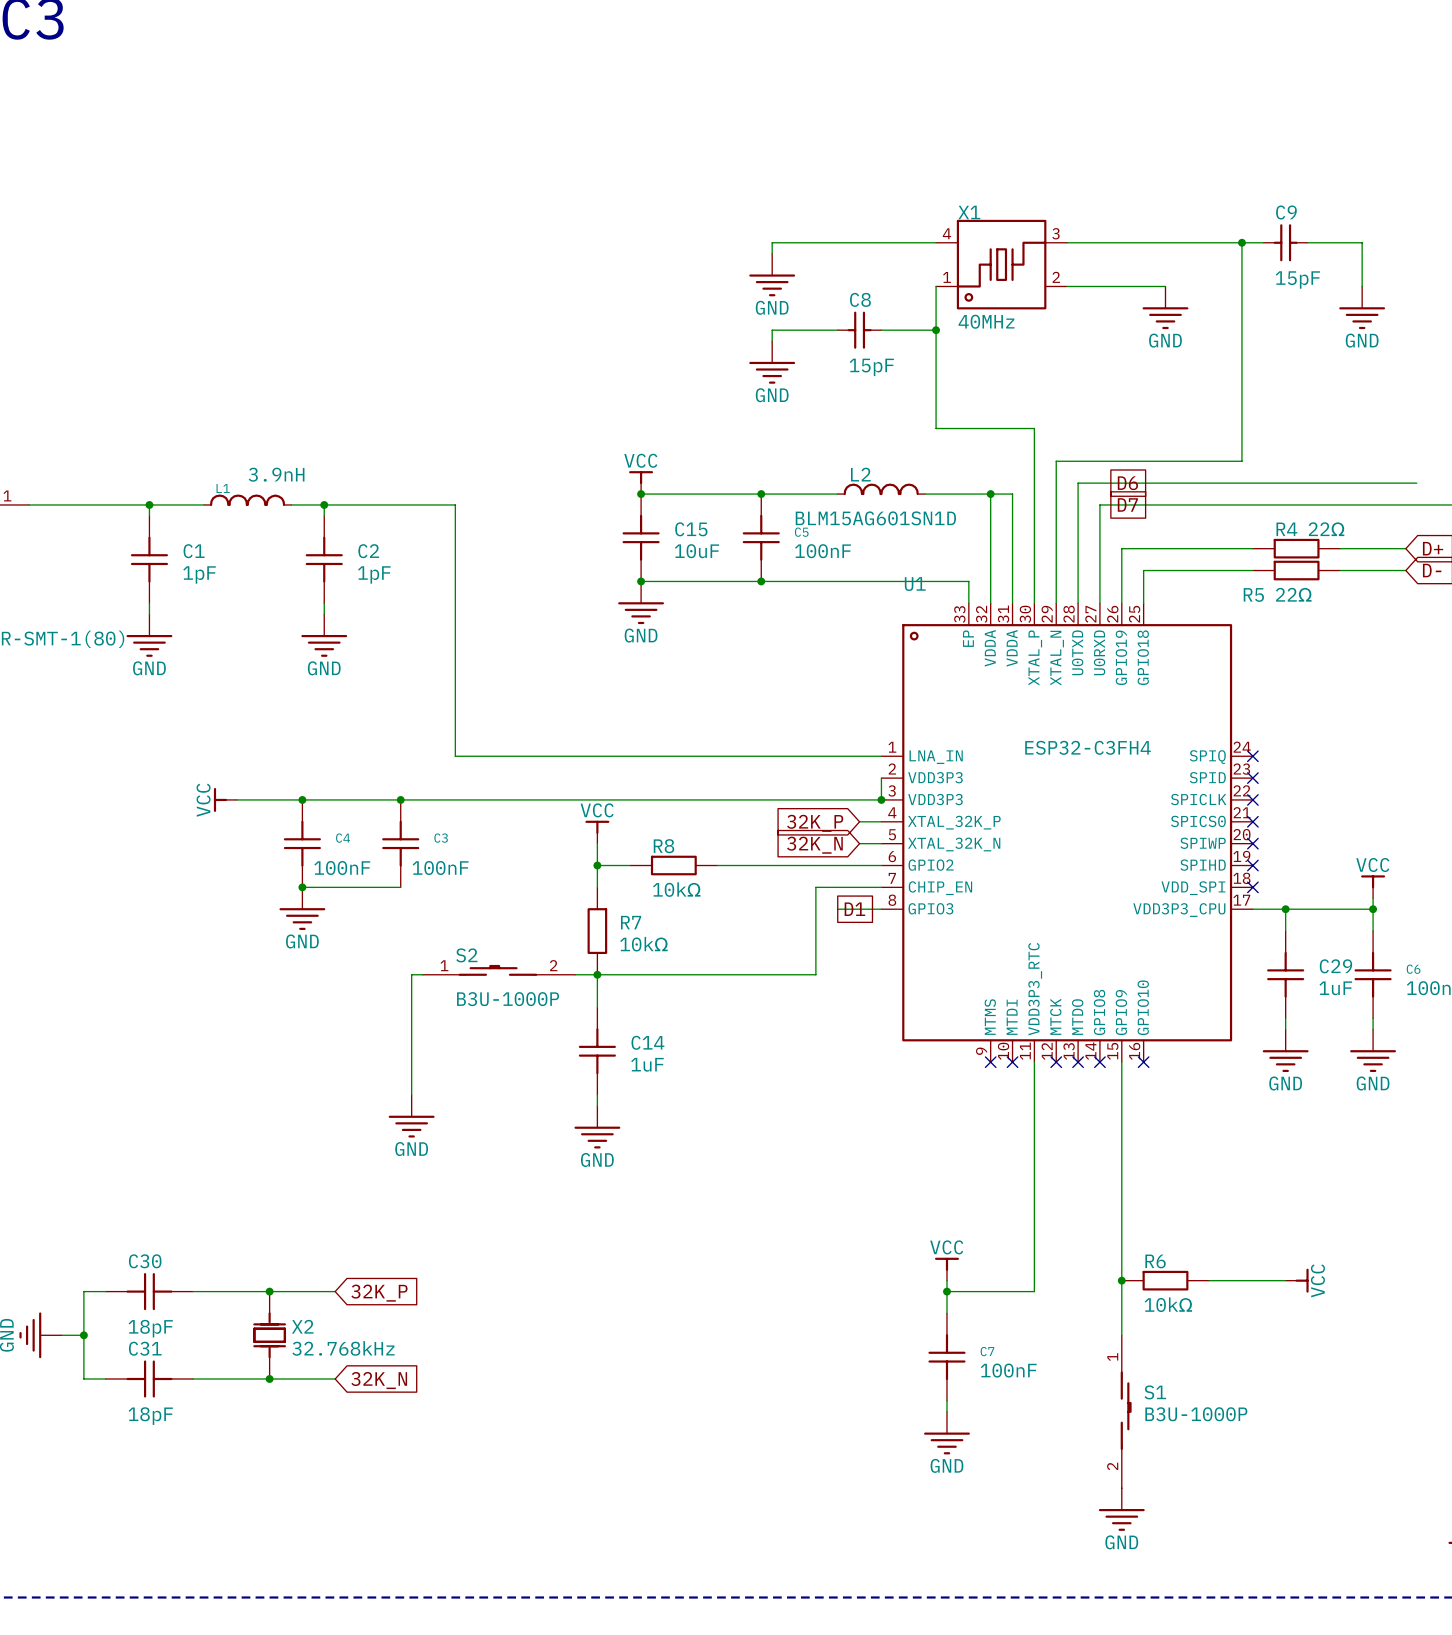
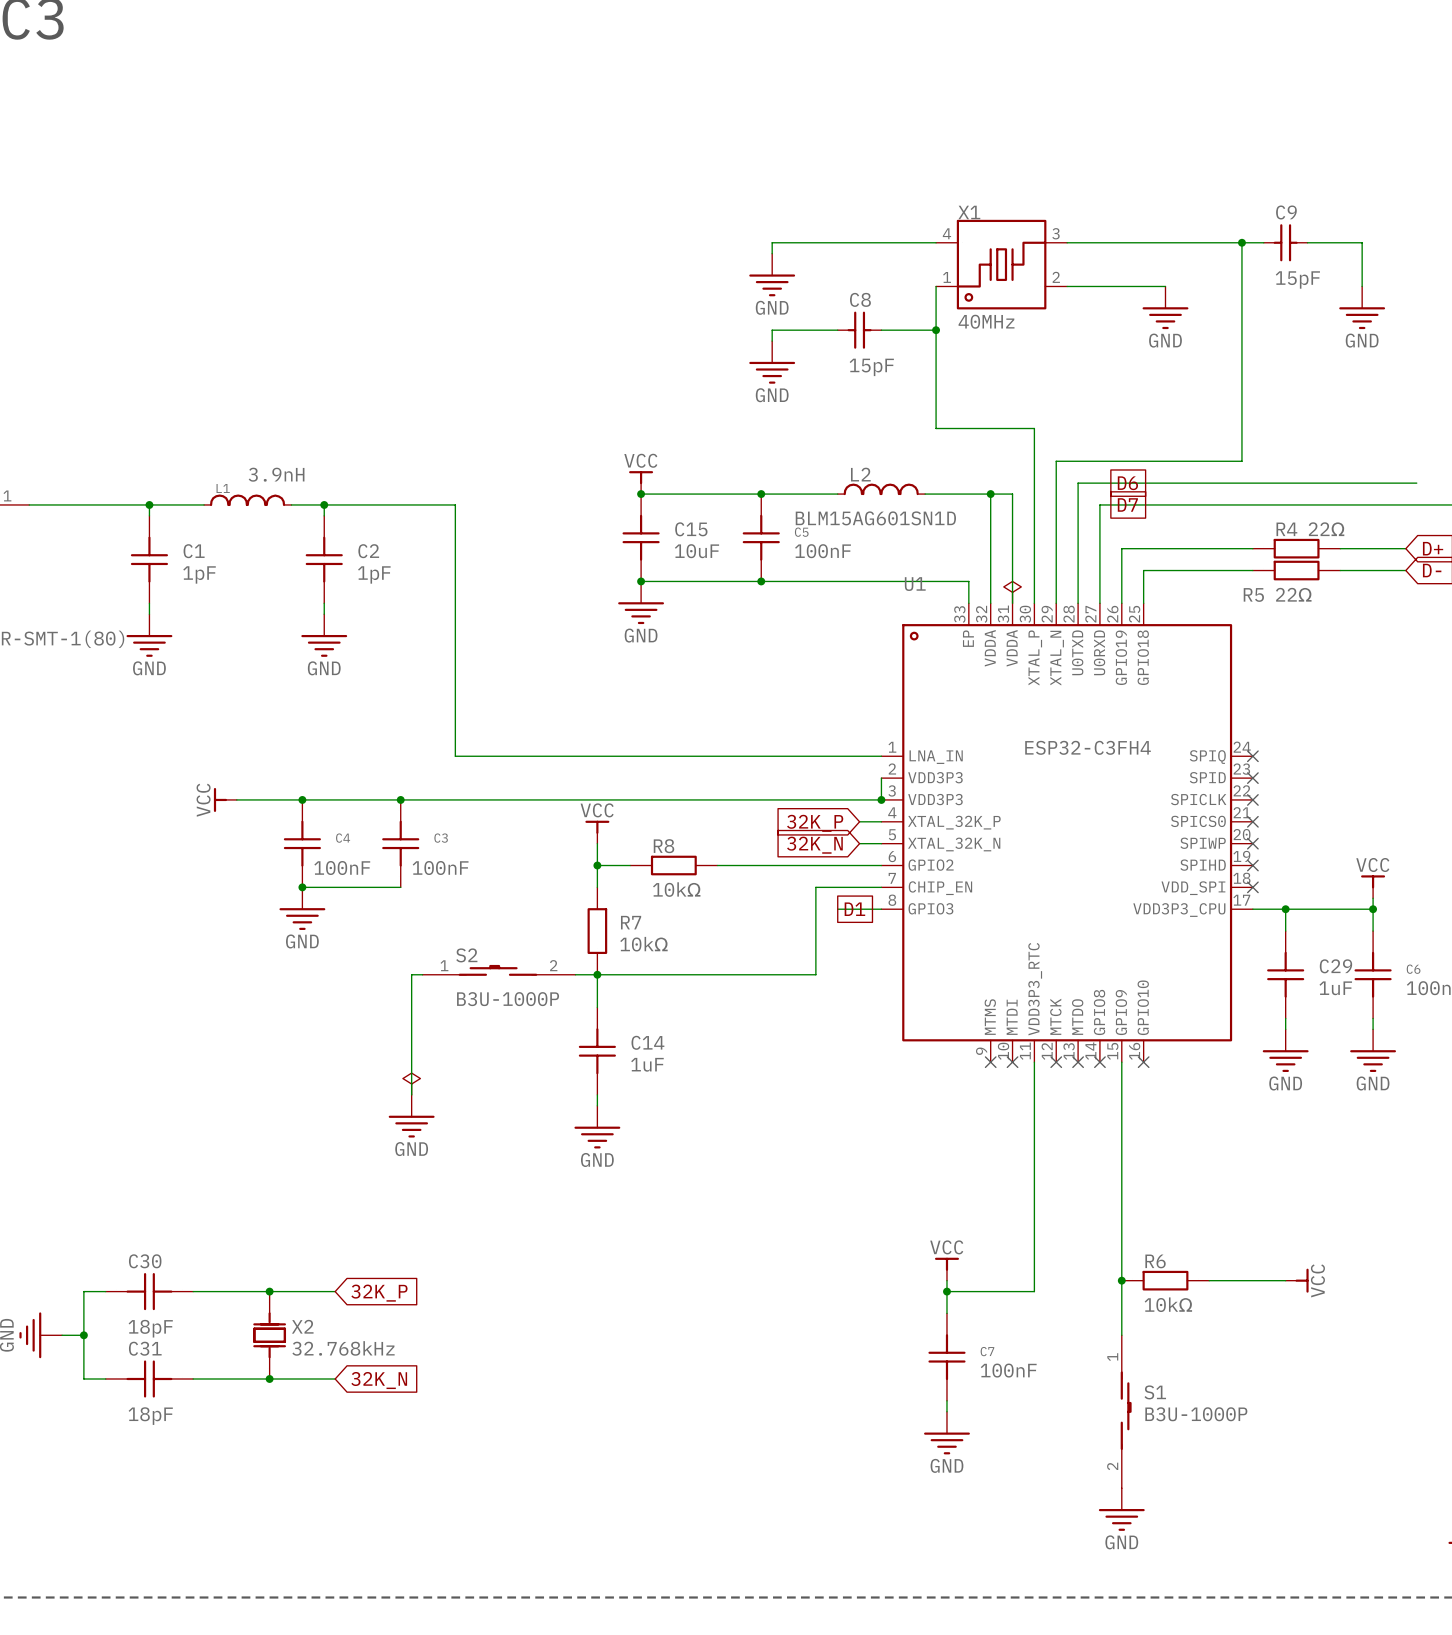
power symbol: none -> (1012, 592)
power symbol: none -> (411, 1084)

